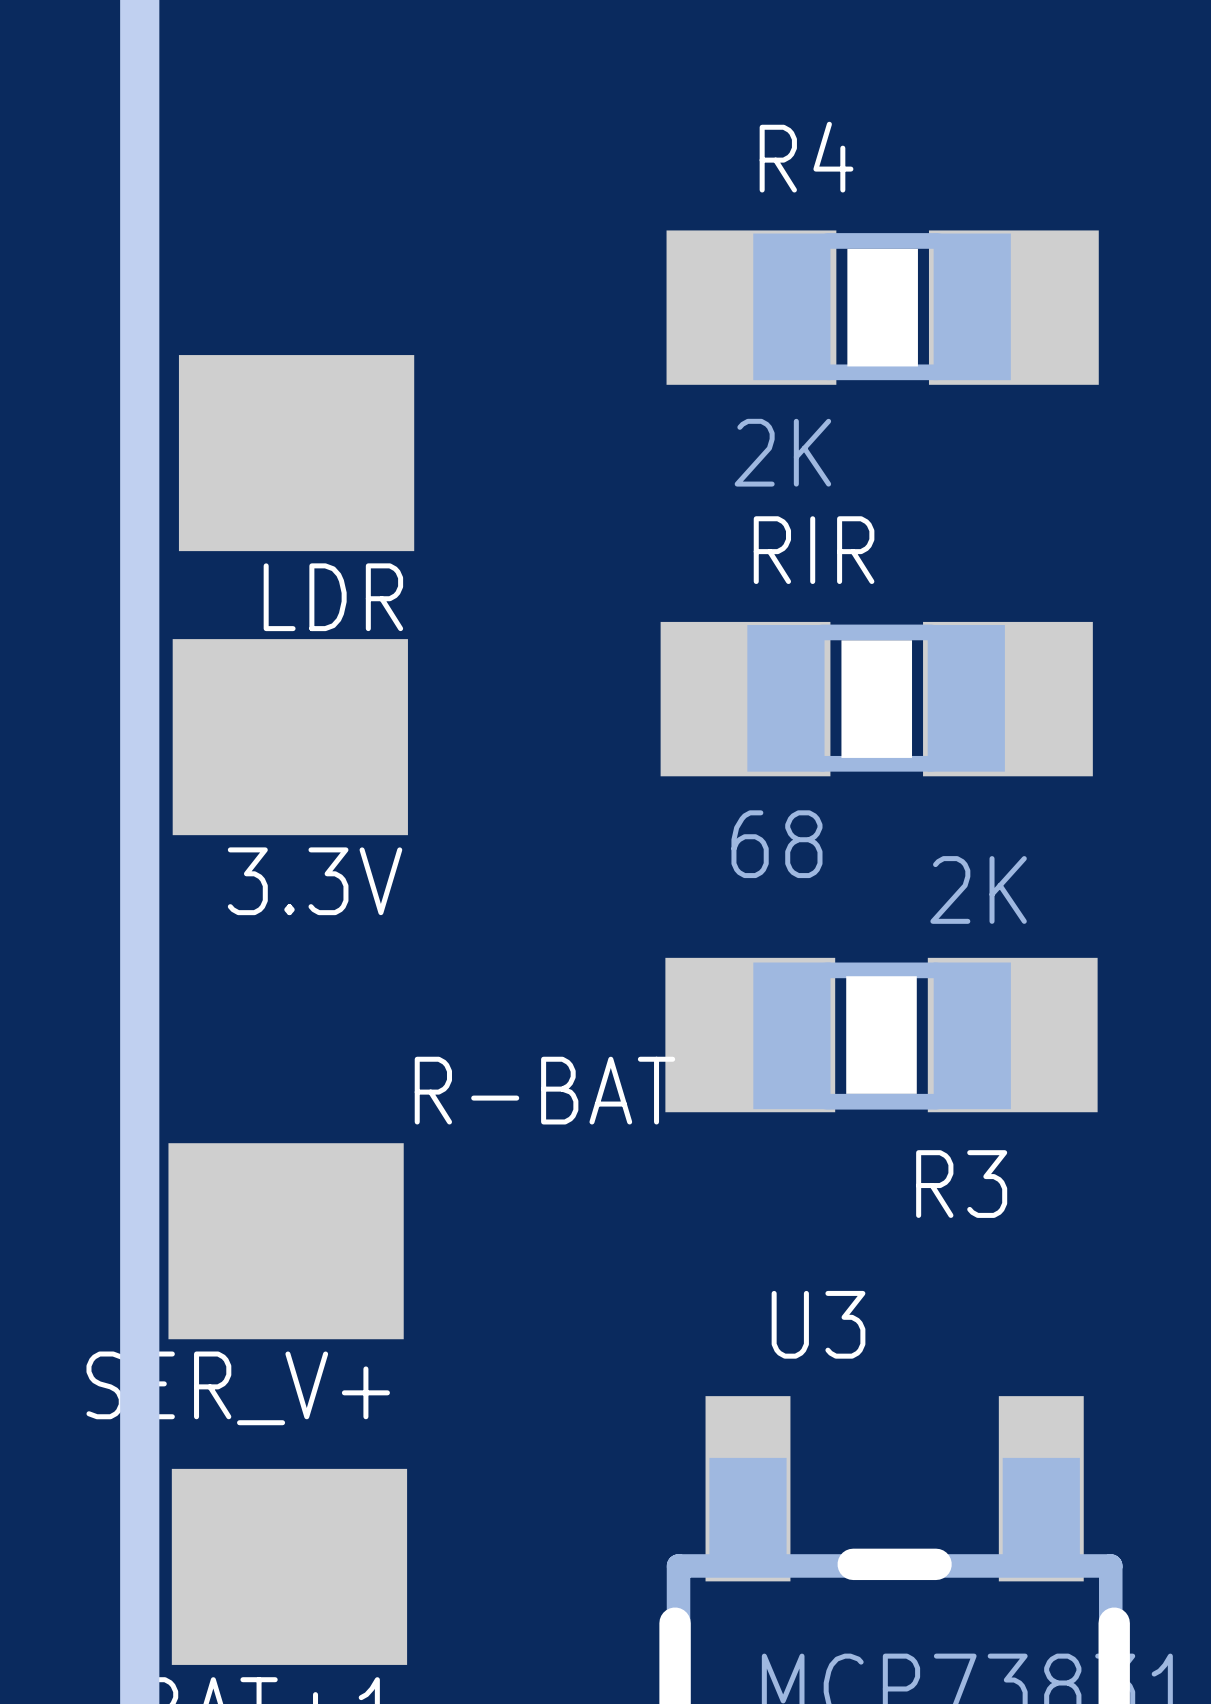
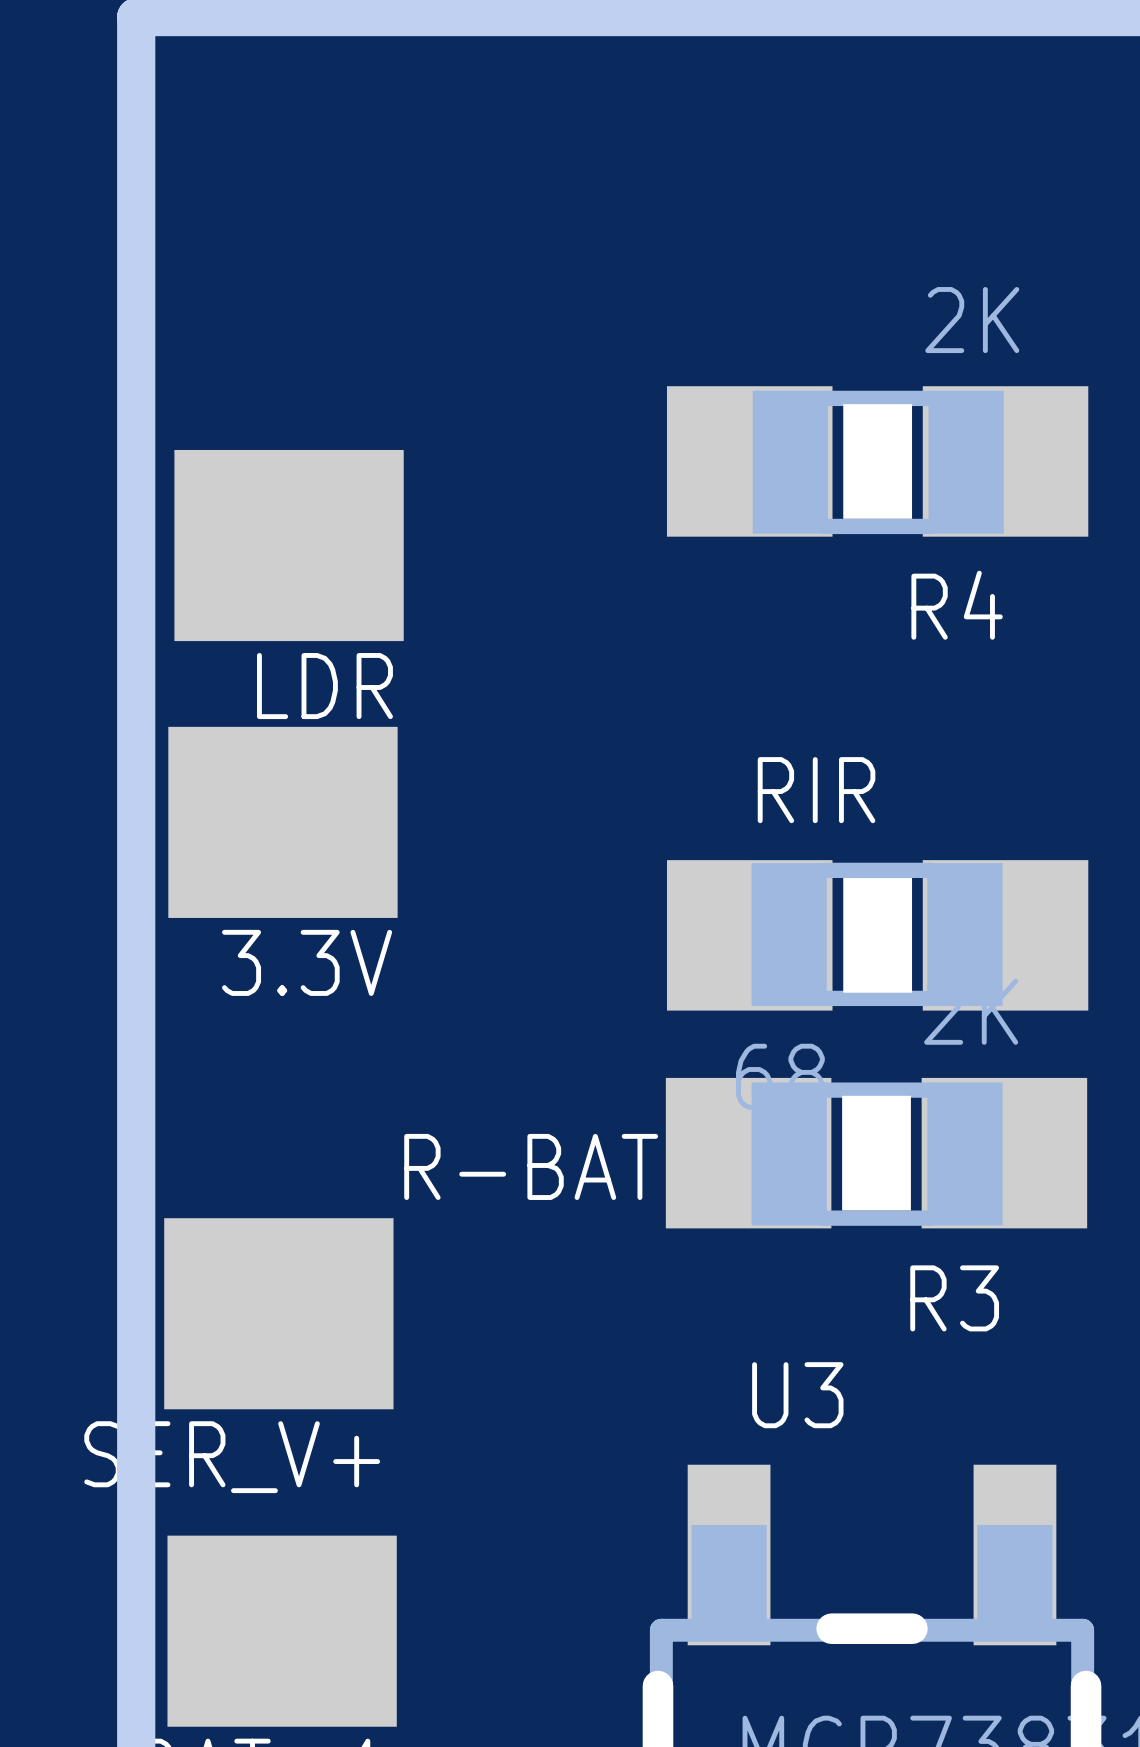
R4 name position: R4 (806, 157) -> R4 (957, 605)
R4 position: (882, 307) -> (877, 461)
R4 value position: 2K (782, 452) -> 2K (972, 320)
RIR position: (876, 699) -> (877, 935)
R3 position: (881, 1035) -> (876, 1153)

